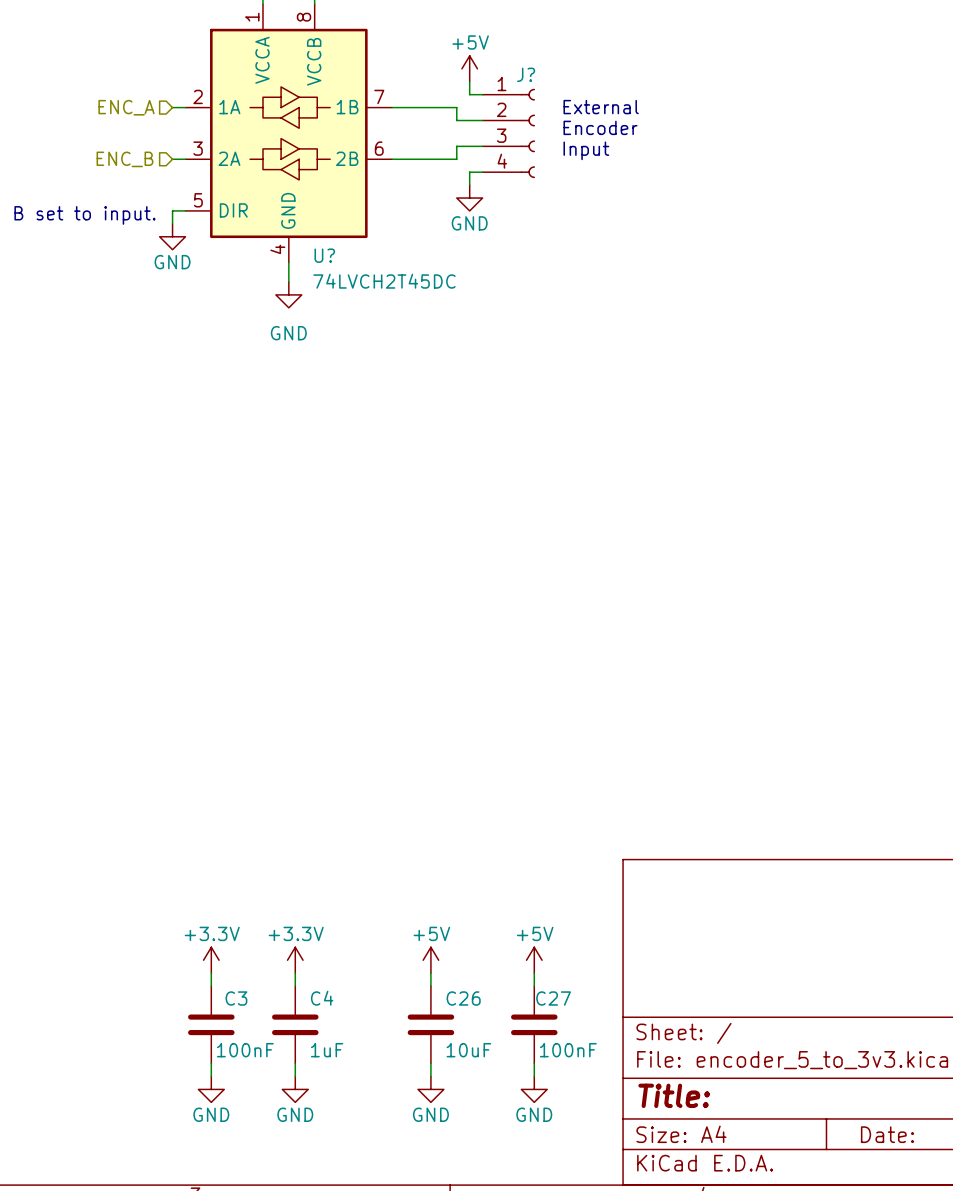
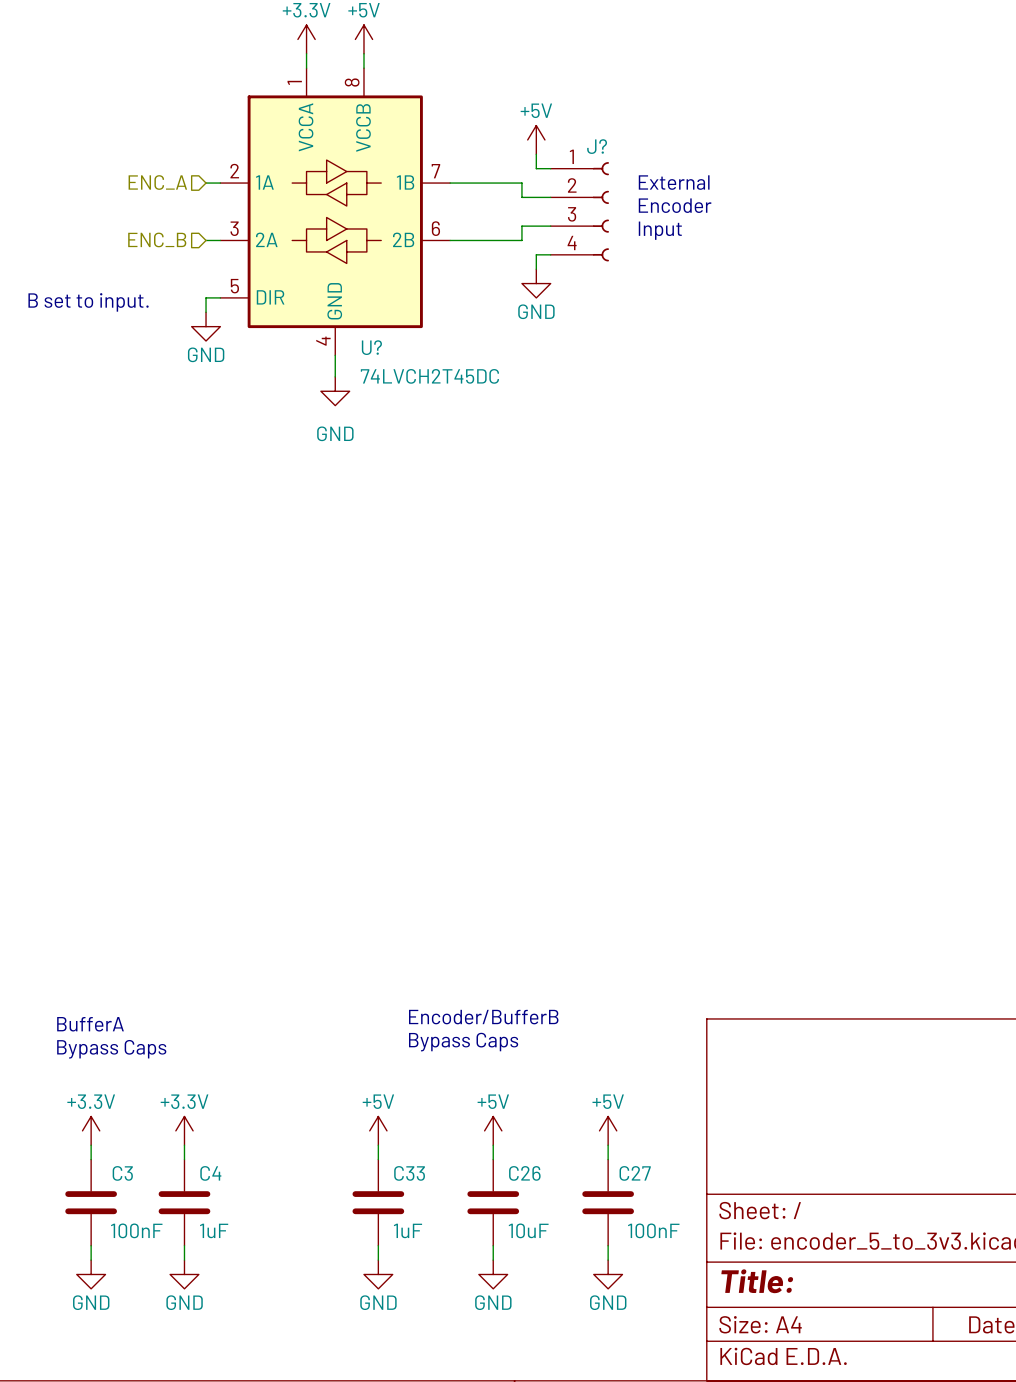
text: none -> Encoder/BufferB (483, 1017)
text: none -> BufferA (90, 1024)
text: none -> Bypass Caps (463, 1042)
text: none -> Bypass Caps (111, 1049)
power symbol: none -> +3.3V (91, 1130)
power symbol position: +3.3V (211, 960) -> +3.3V (184, 1130)
power symbol: +3.3V (295, 960) -> none
power symbol: none -> +5V (378, 1130)
wire: (211, 973) (211, 986) -> (91, 1145) (91, 1159)
wire: (295, 973) (295, 986) -> (184, 1145) (184, 1159)
wire: none -> (378, 1145) (378, 1159)
C3 position: (211, 1024) -> (91, 1202)
C4 position: (295, 1024) -> (184, 1202)
C33: none -> 1uF (378, 1202)
wire: (211, 1063) (211, 1076) -> (91, 1245) (91, 1260)
wire: (295, 1063) (295, 1076) -> (184, 1245) (184, 1260)
wire: none -> (378, 1245) (378, 1260)
power symbol: none -> GND (91, 1274)
power symbol: none -> GND (184, 1274)
power symbol: GND (211, 1089) -> none
power symbol position: GND (295, 1089) -> GND (378, 1274)

